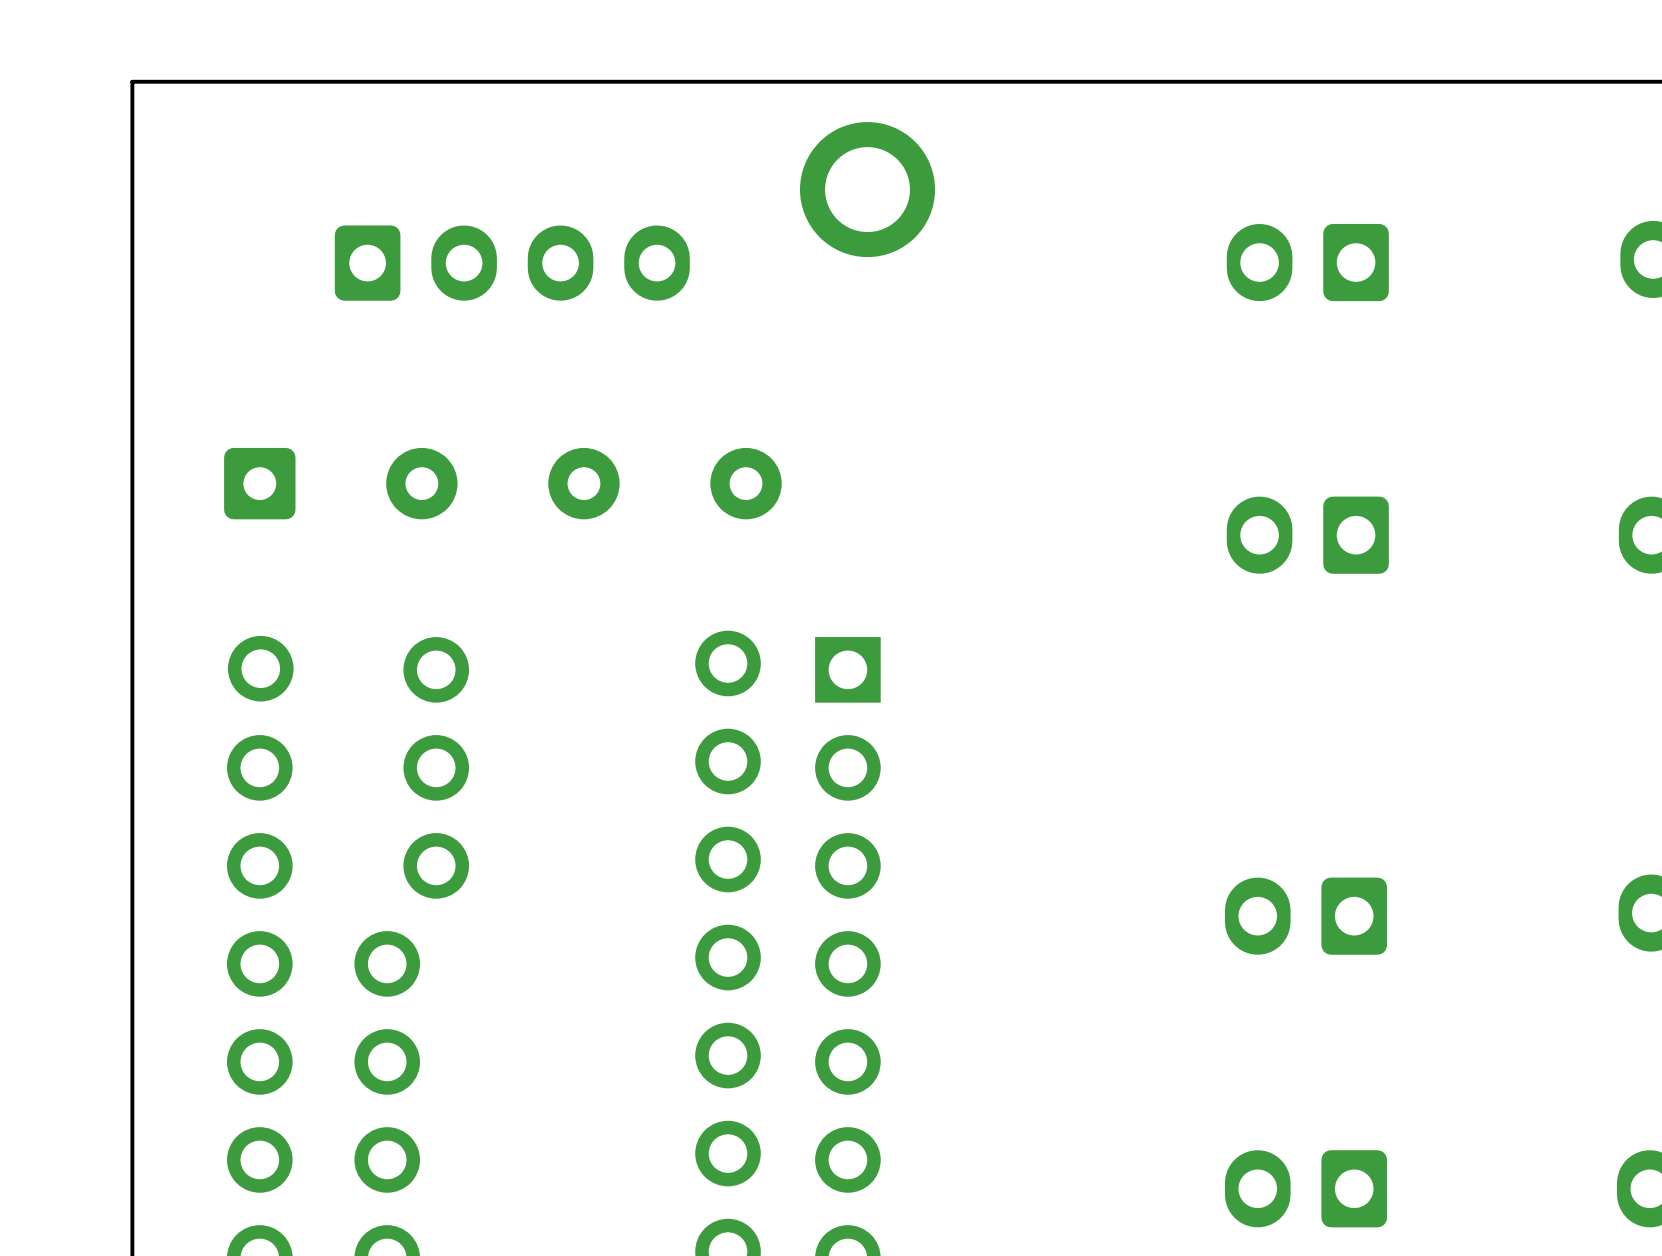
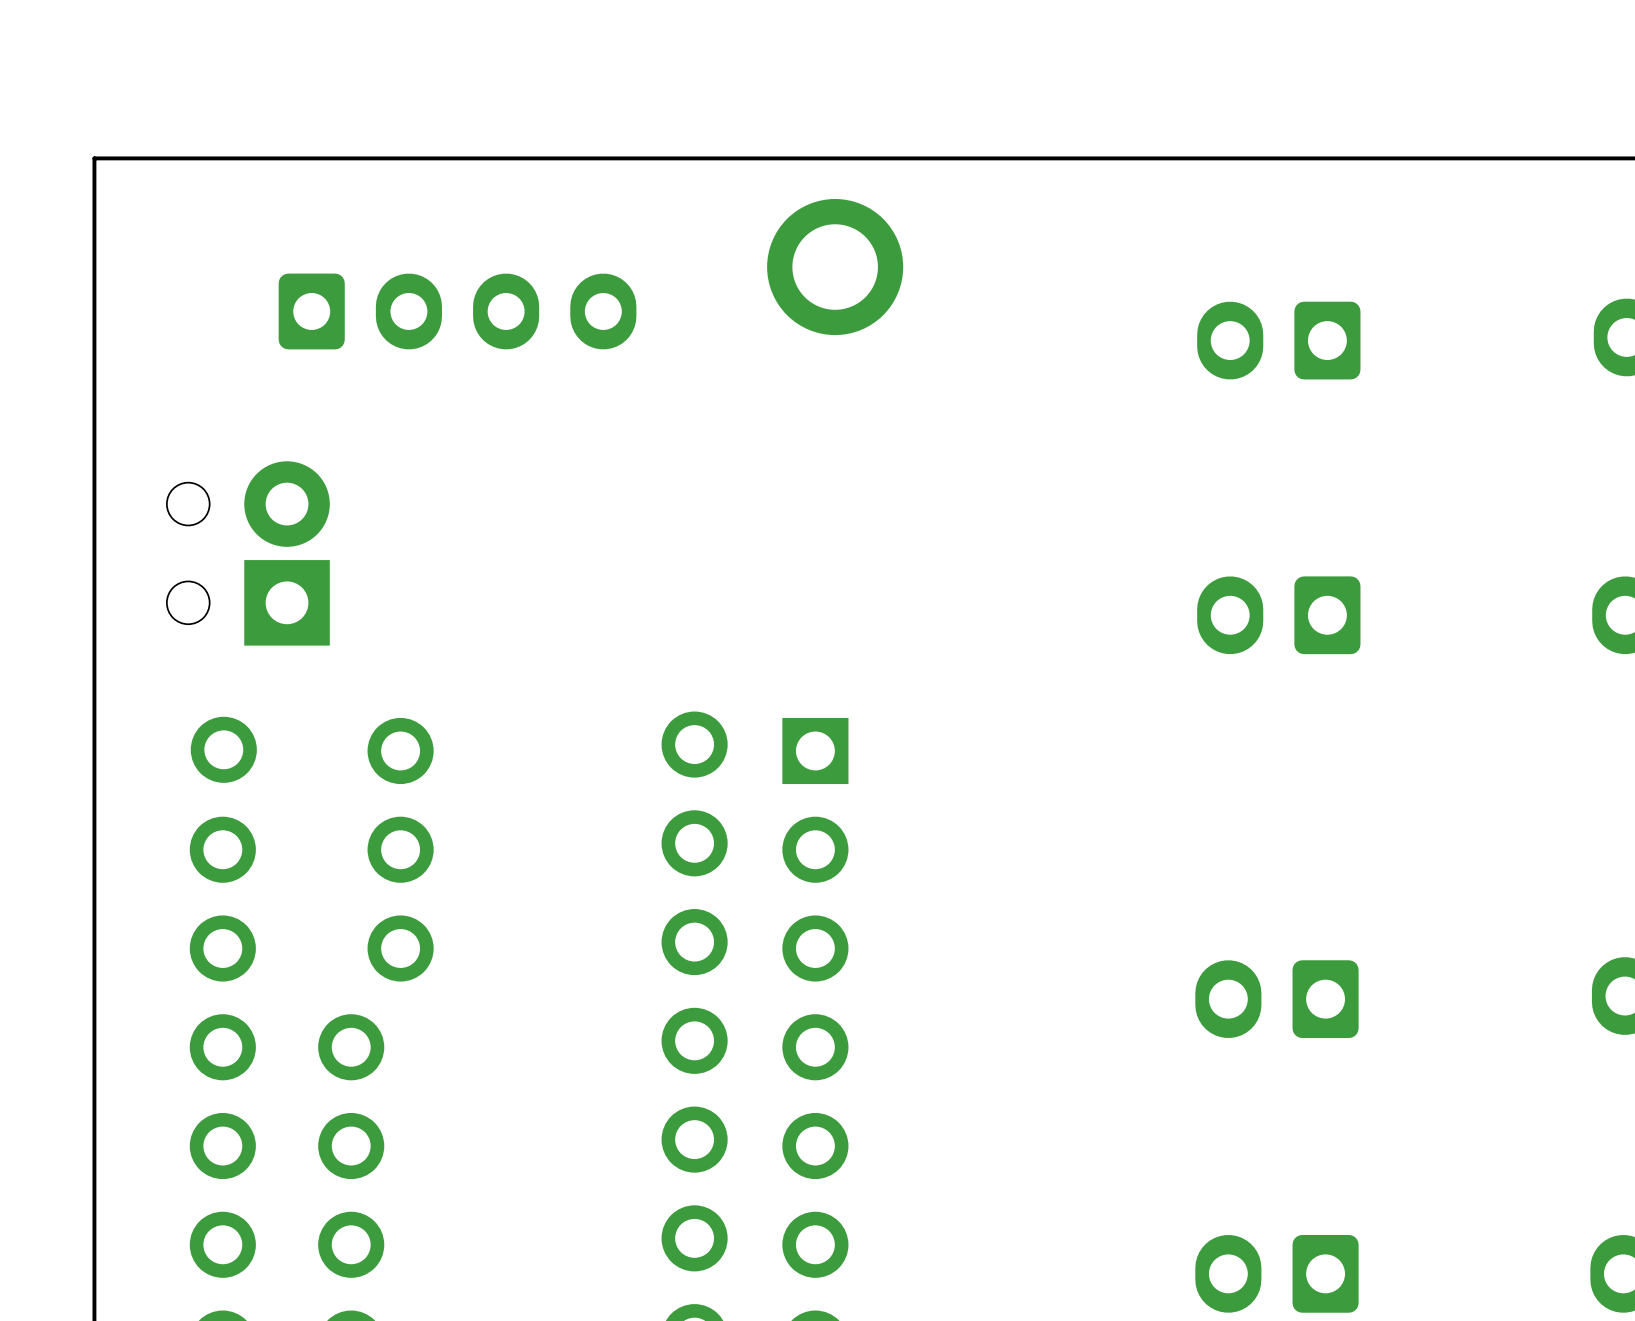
part position: (512, 263) -> (457, 311)
part: none -> (248, 553)
part: (502, 483) -> none

